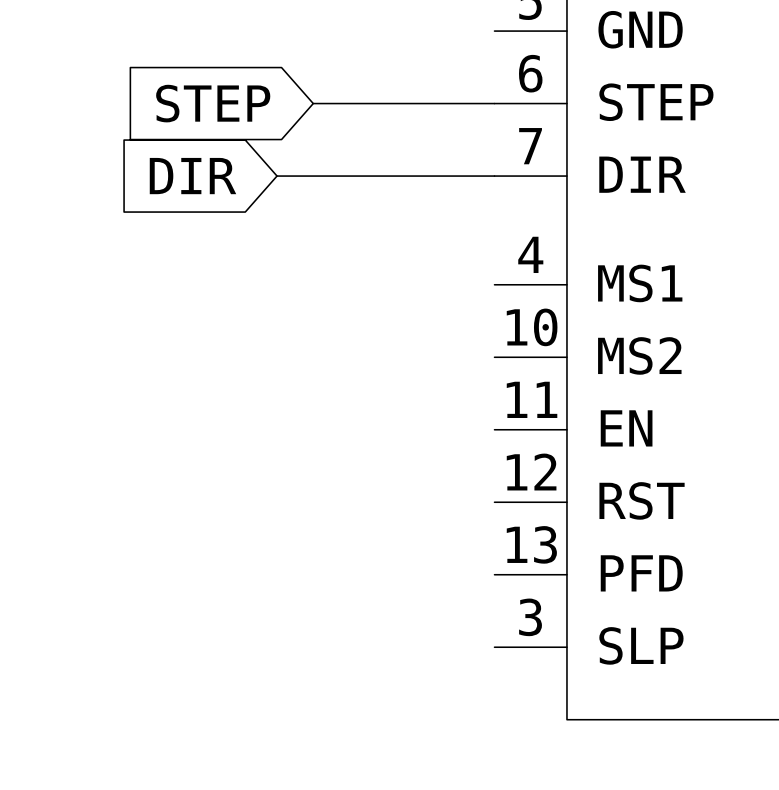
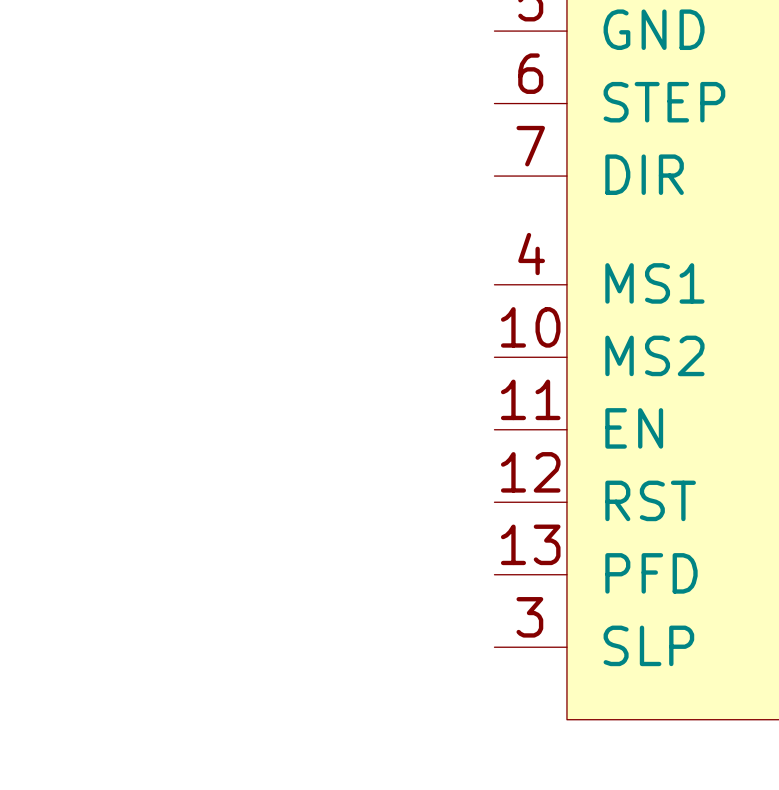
global label: STEP (213, 103) -> none
wire: (313, 103) (494, 103) -> none
global label: DIR (193, 176) -> none
wire: (277, 176) (494, 176) -> none

